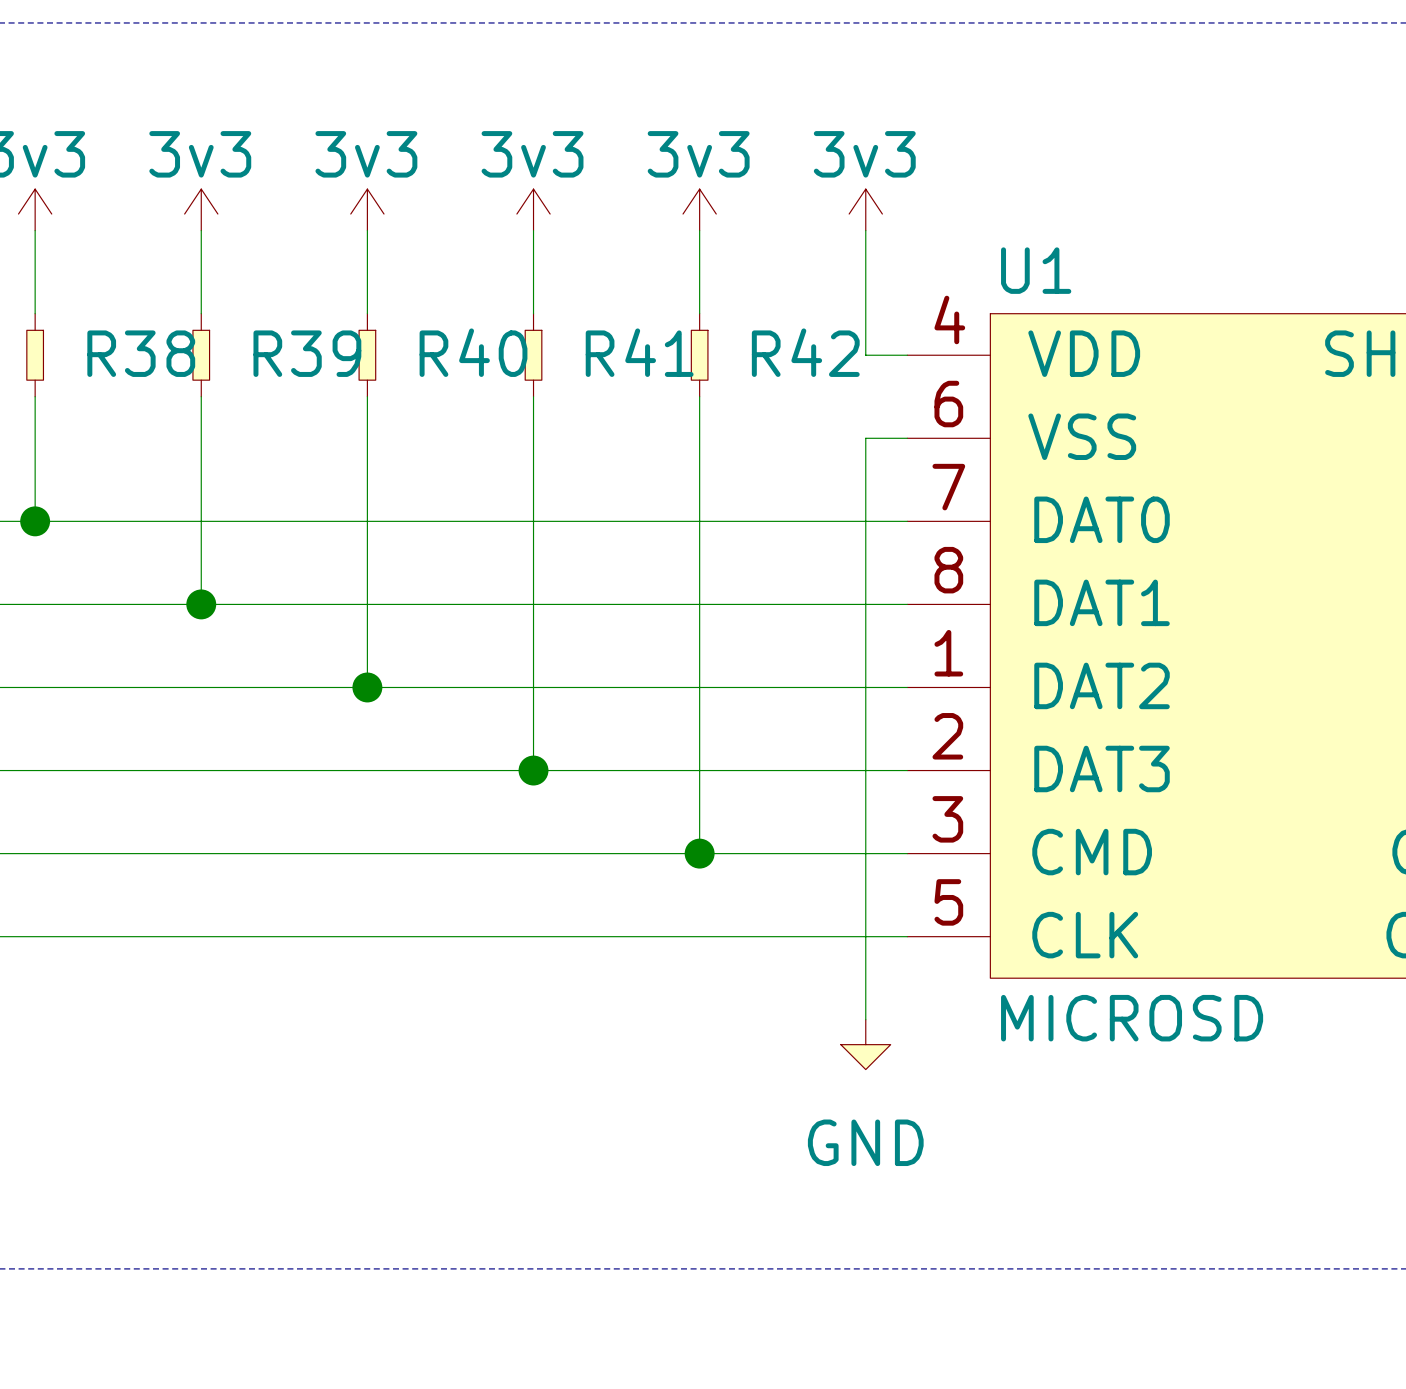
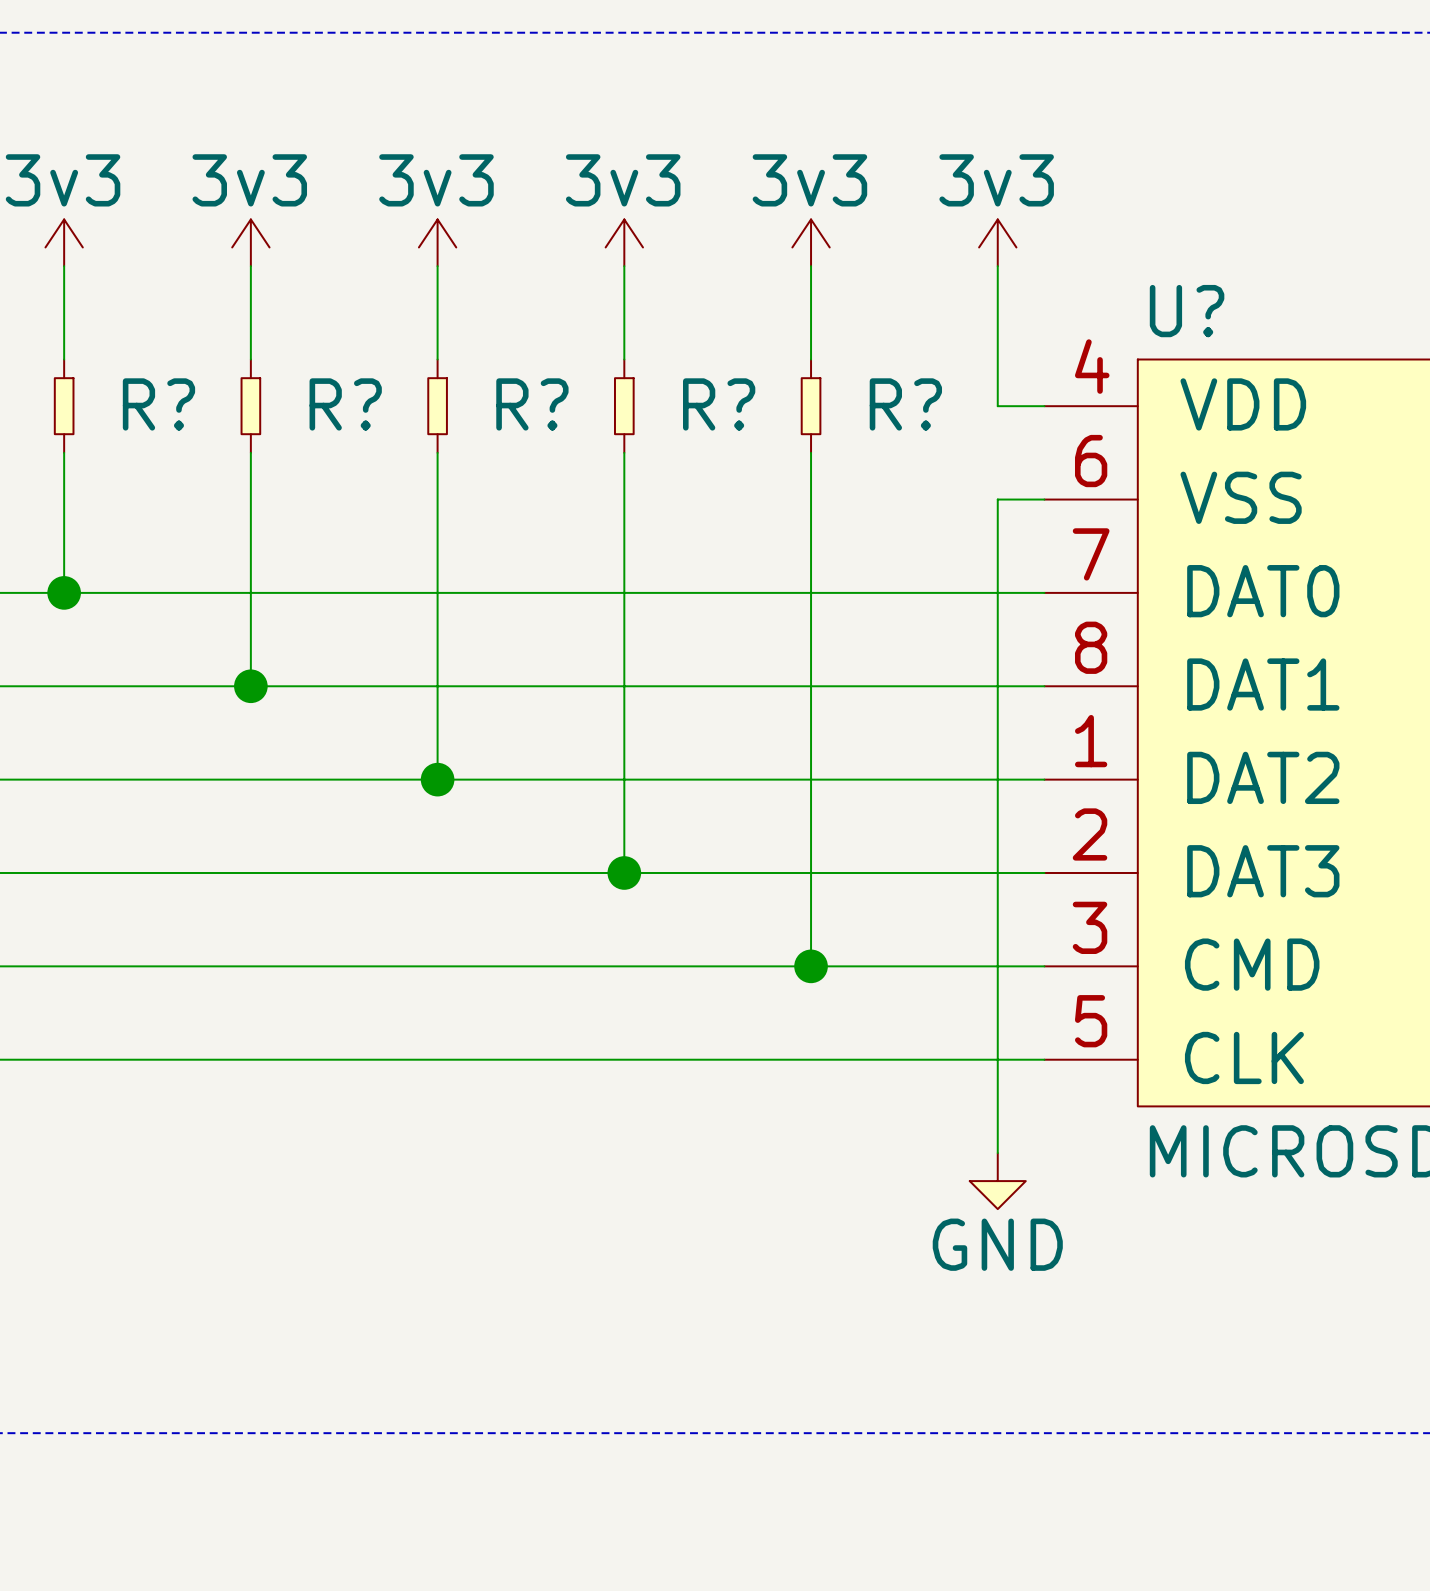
U1 name: U1 (1036, 270) -> U? (1187, 311)
R40 name: R40 (473, 352) -> R? (532, 404)
R41 name: R41 (639, 352) -> R? (719, 404)
R42 name: R42 (805, 352) -> R? (905, 404)
R38 name: R38 (141, 353) -> R? (158, 404)
R39 name: R39 (307, 353) -> R? (345, 404)
power symbol text position: GND (865, 1142) -> GND (997, 1244)

